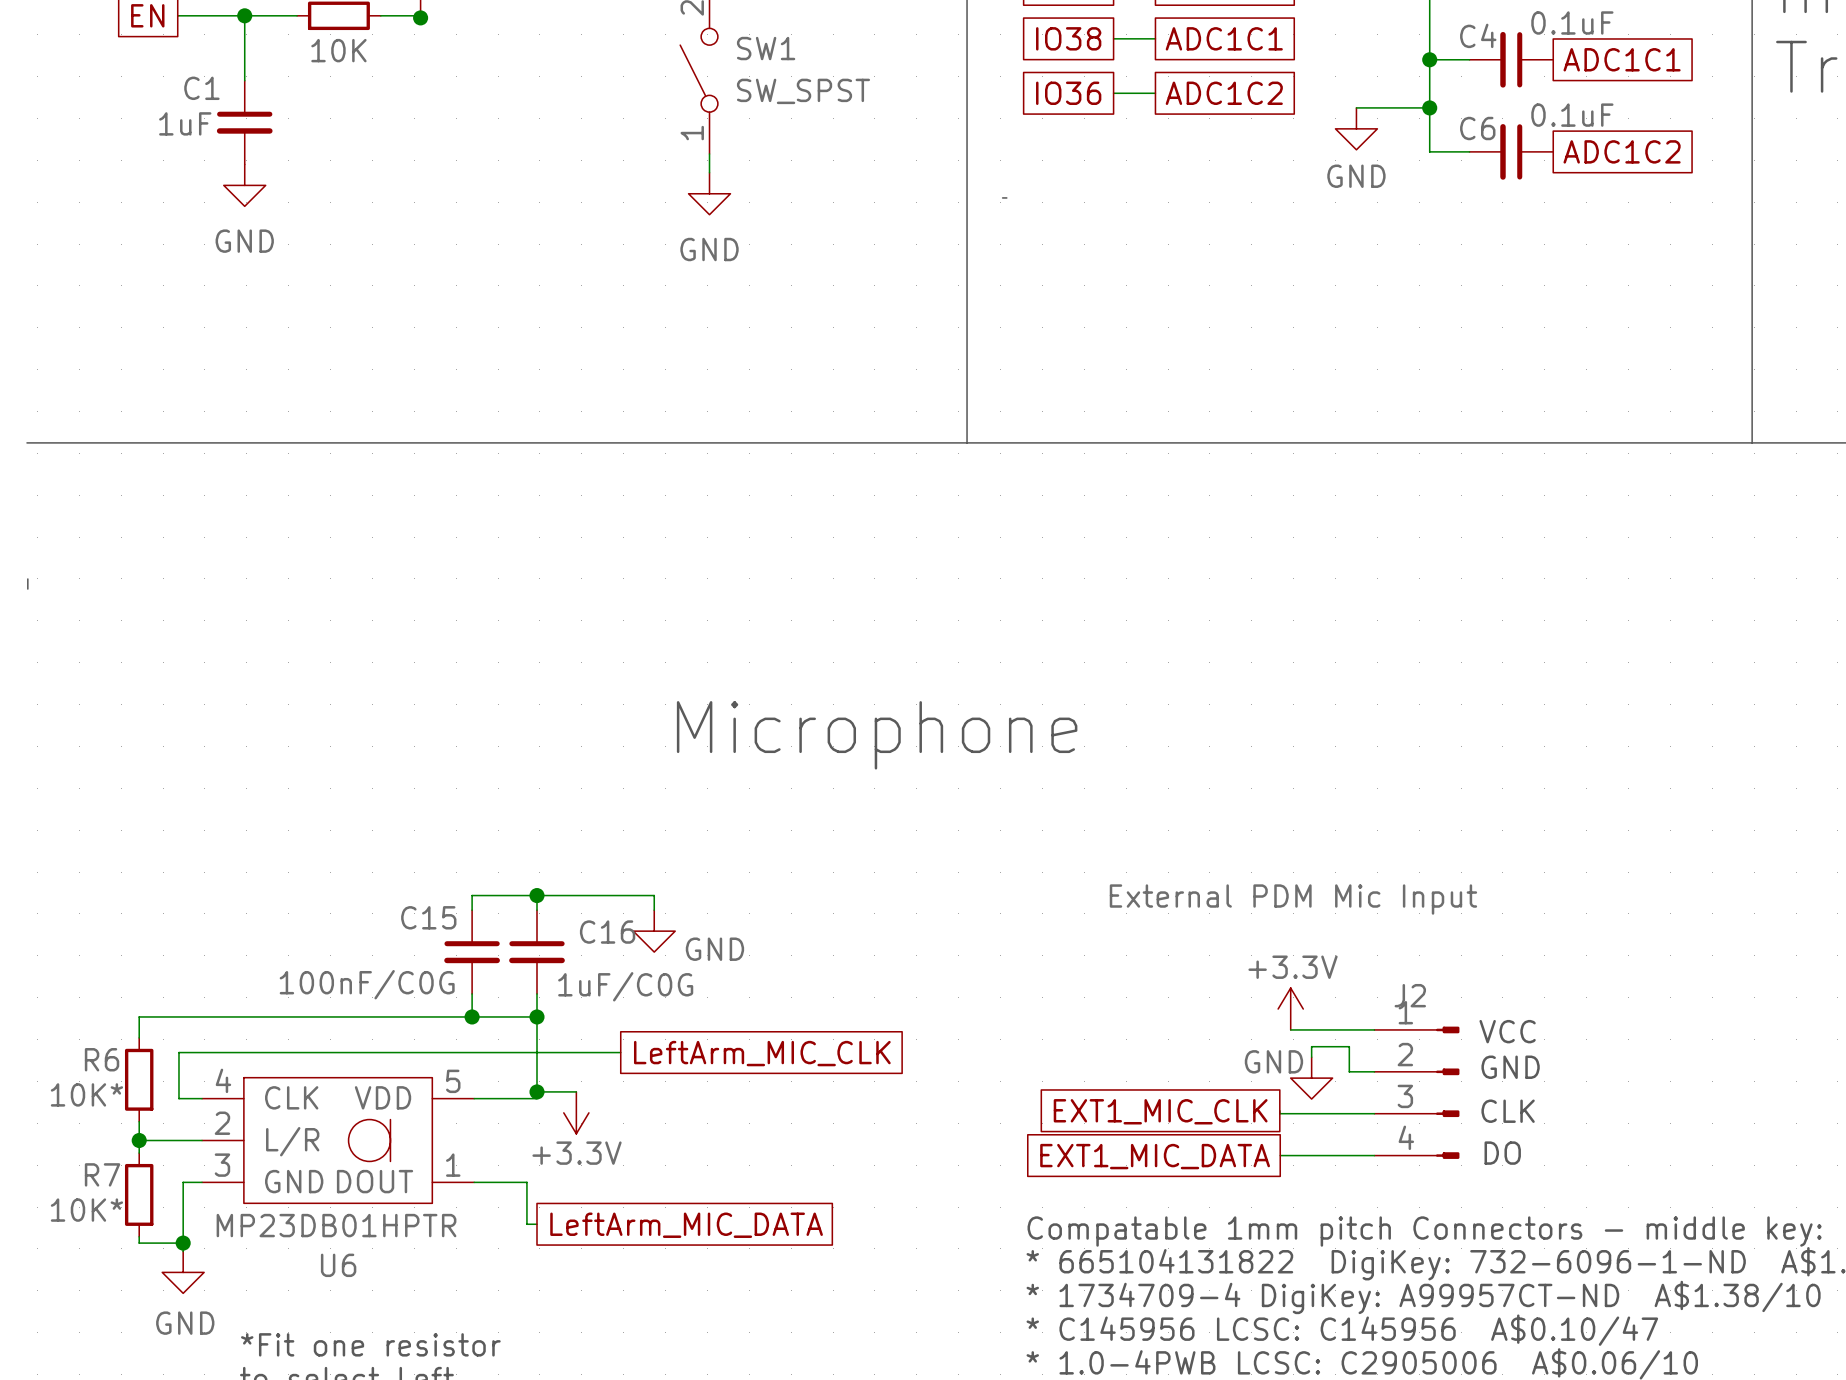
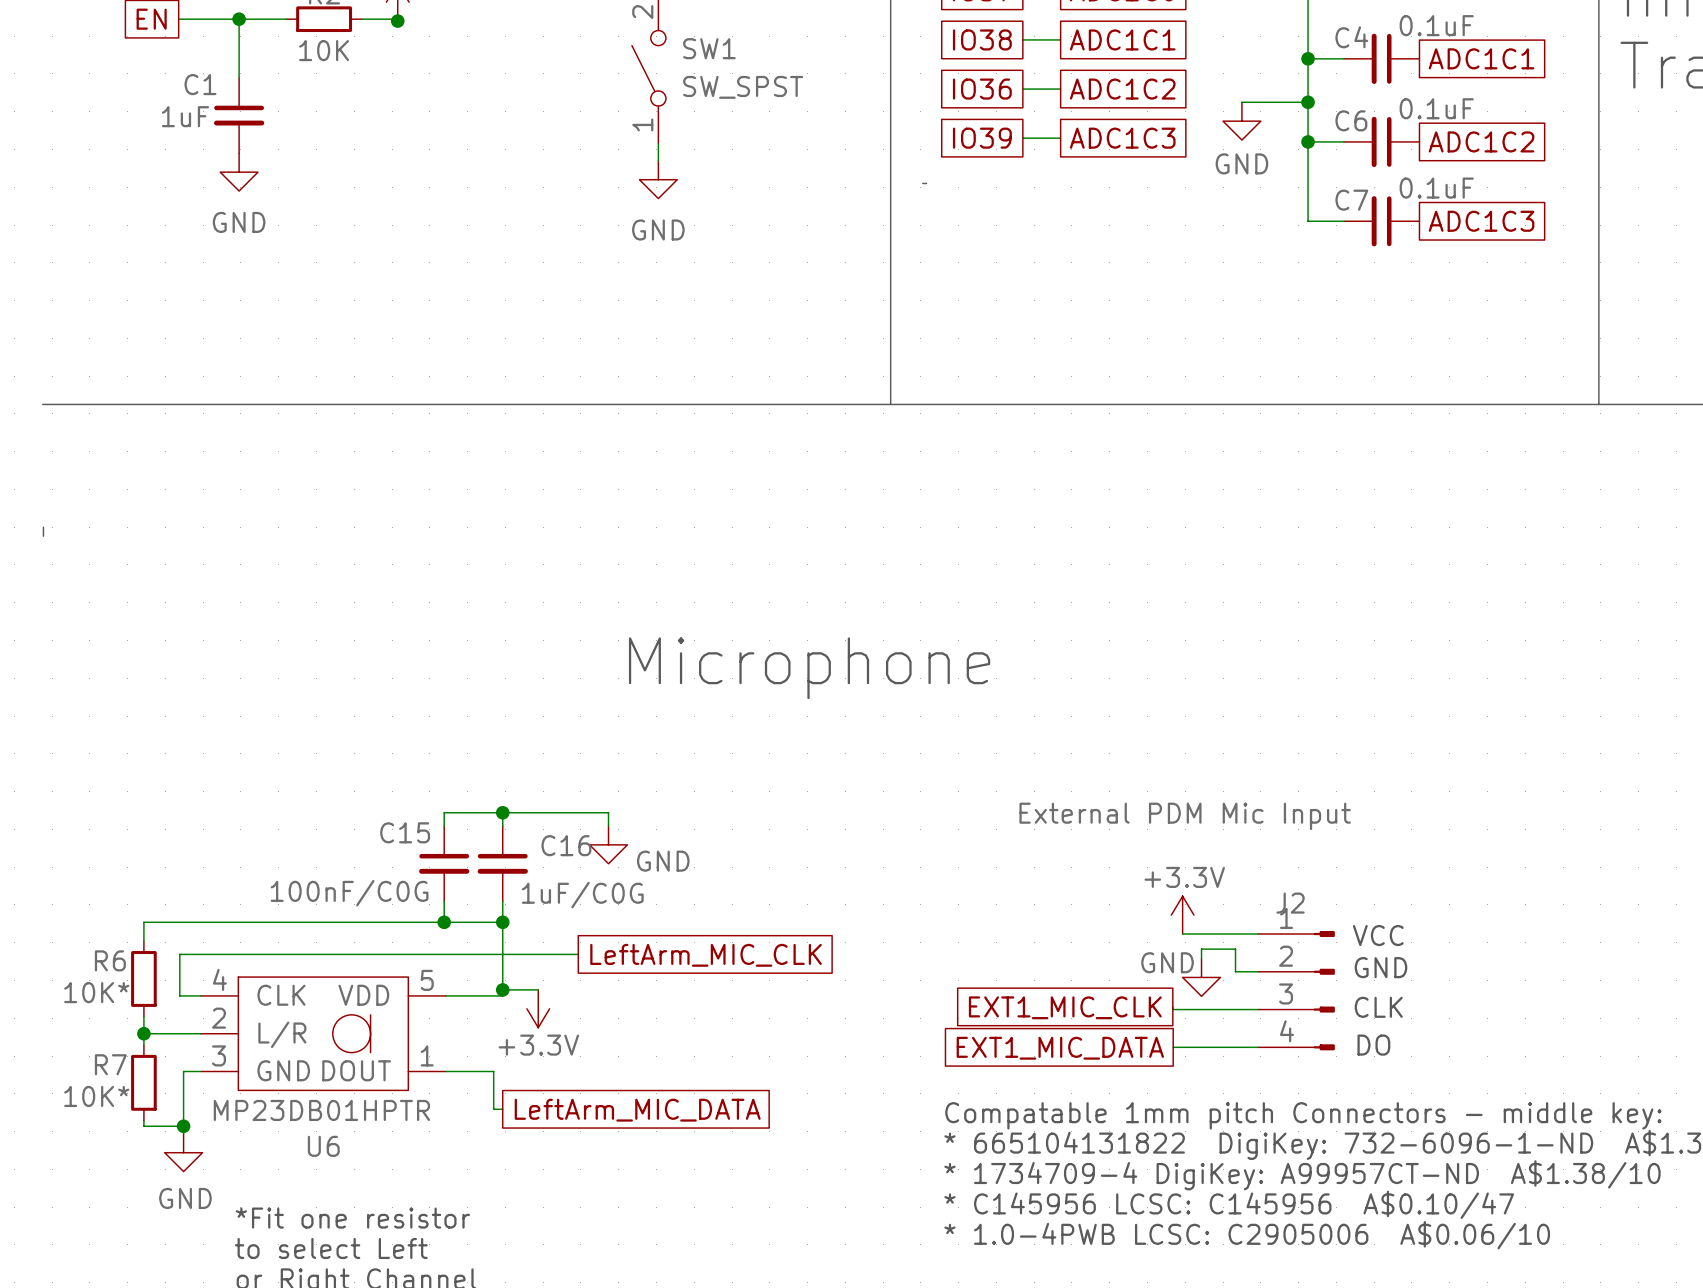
global label: none -> IO39 (982, 138)
wire: none -> (1022, 138) (1060, 138)
global label: none -> ADC1C3 (1122, 138)
wire: none -> (1308, 141) (1308, 221) (1343, 221)
junction: none -> (1308, 141)
C7: none -> 0.1uF (1381, 221)
global label: none -> ADC1C3 (1481, 221)

